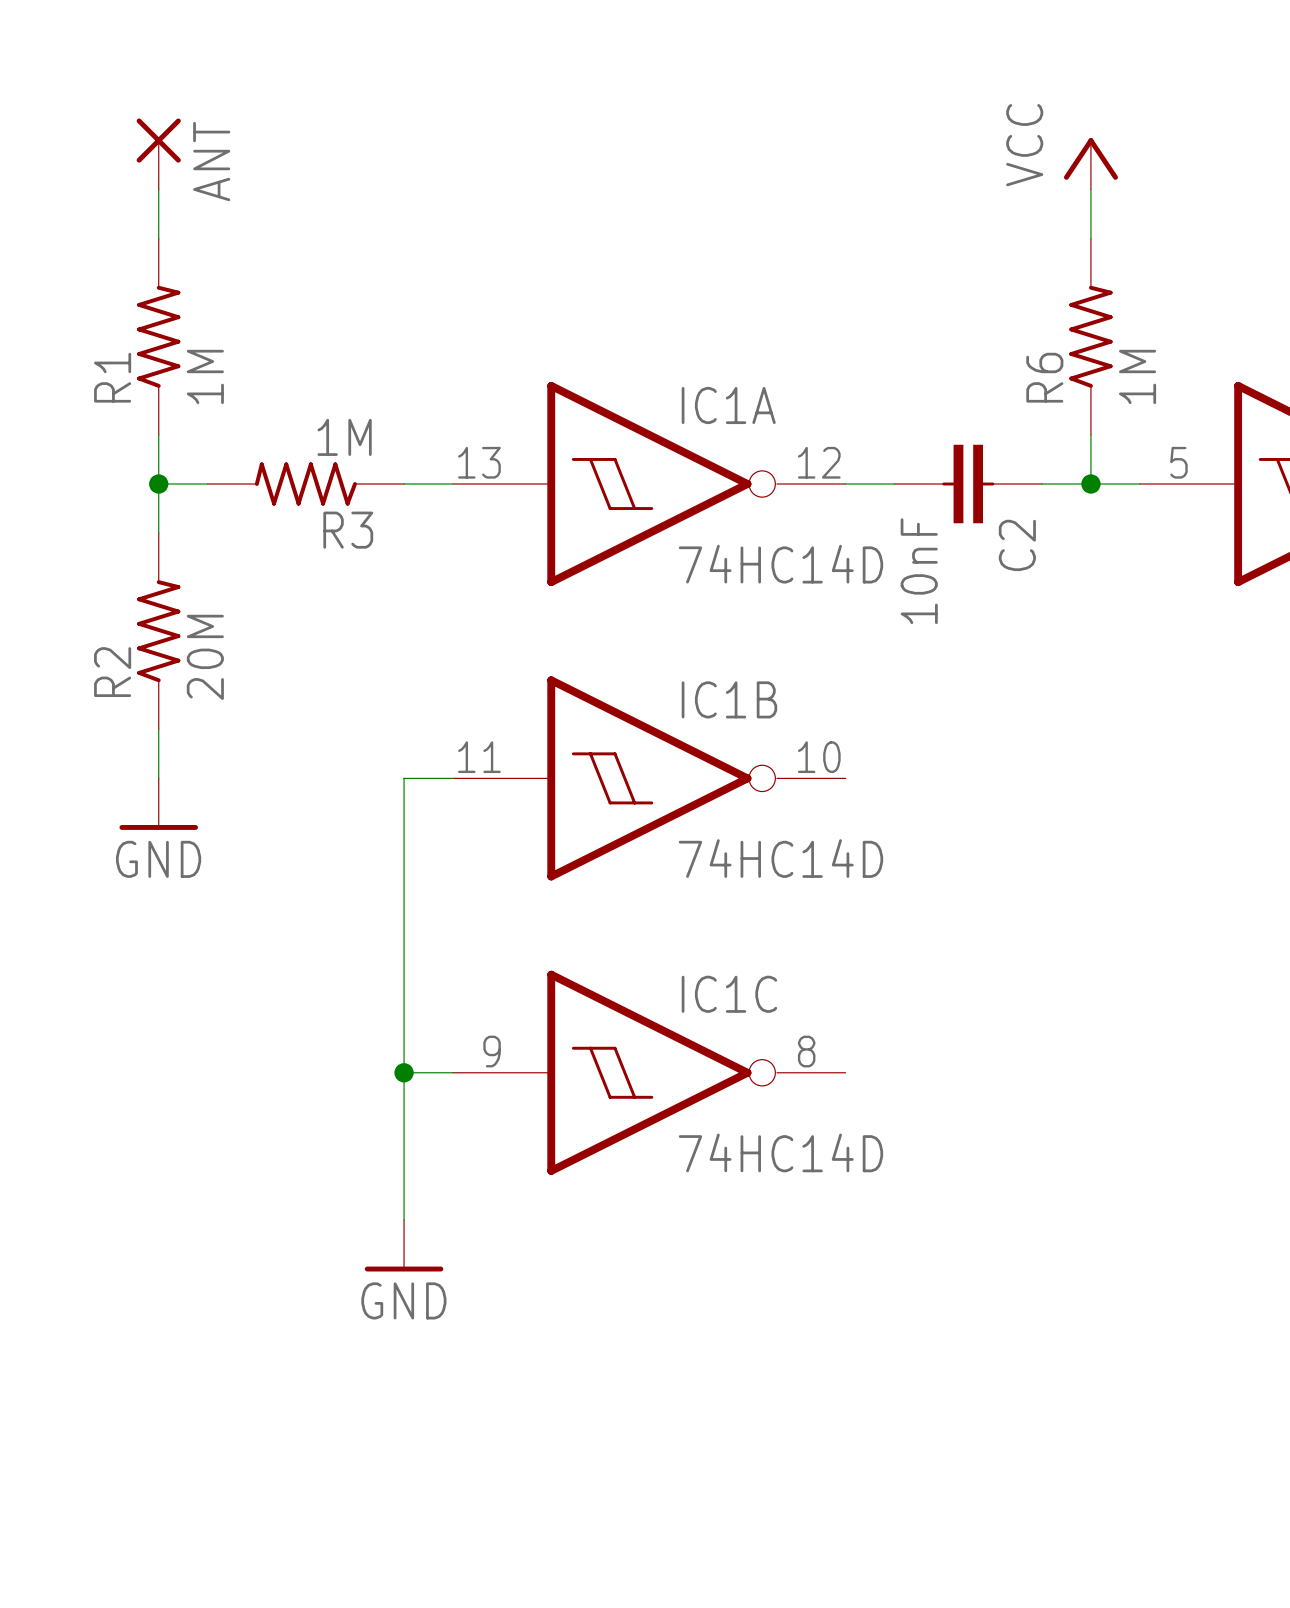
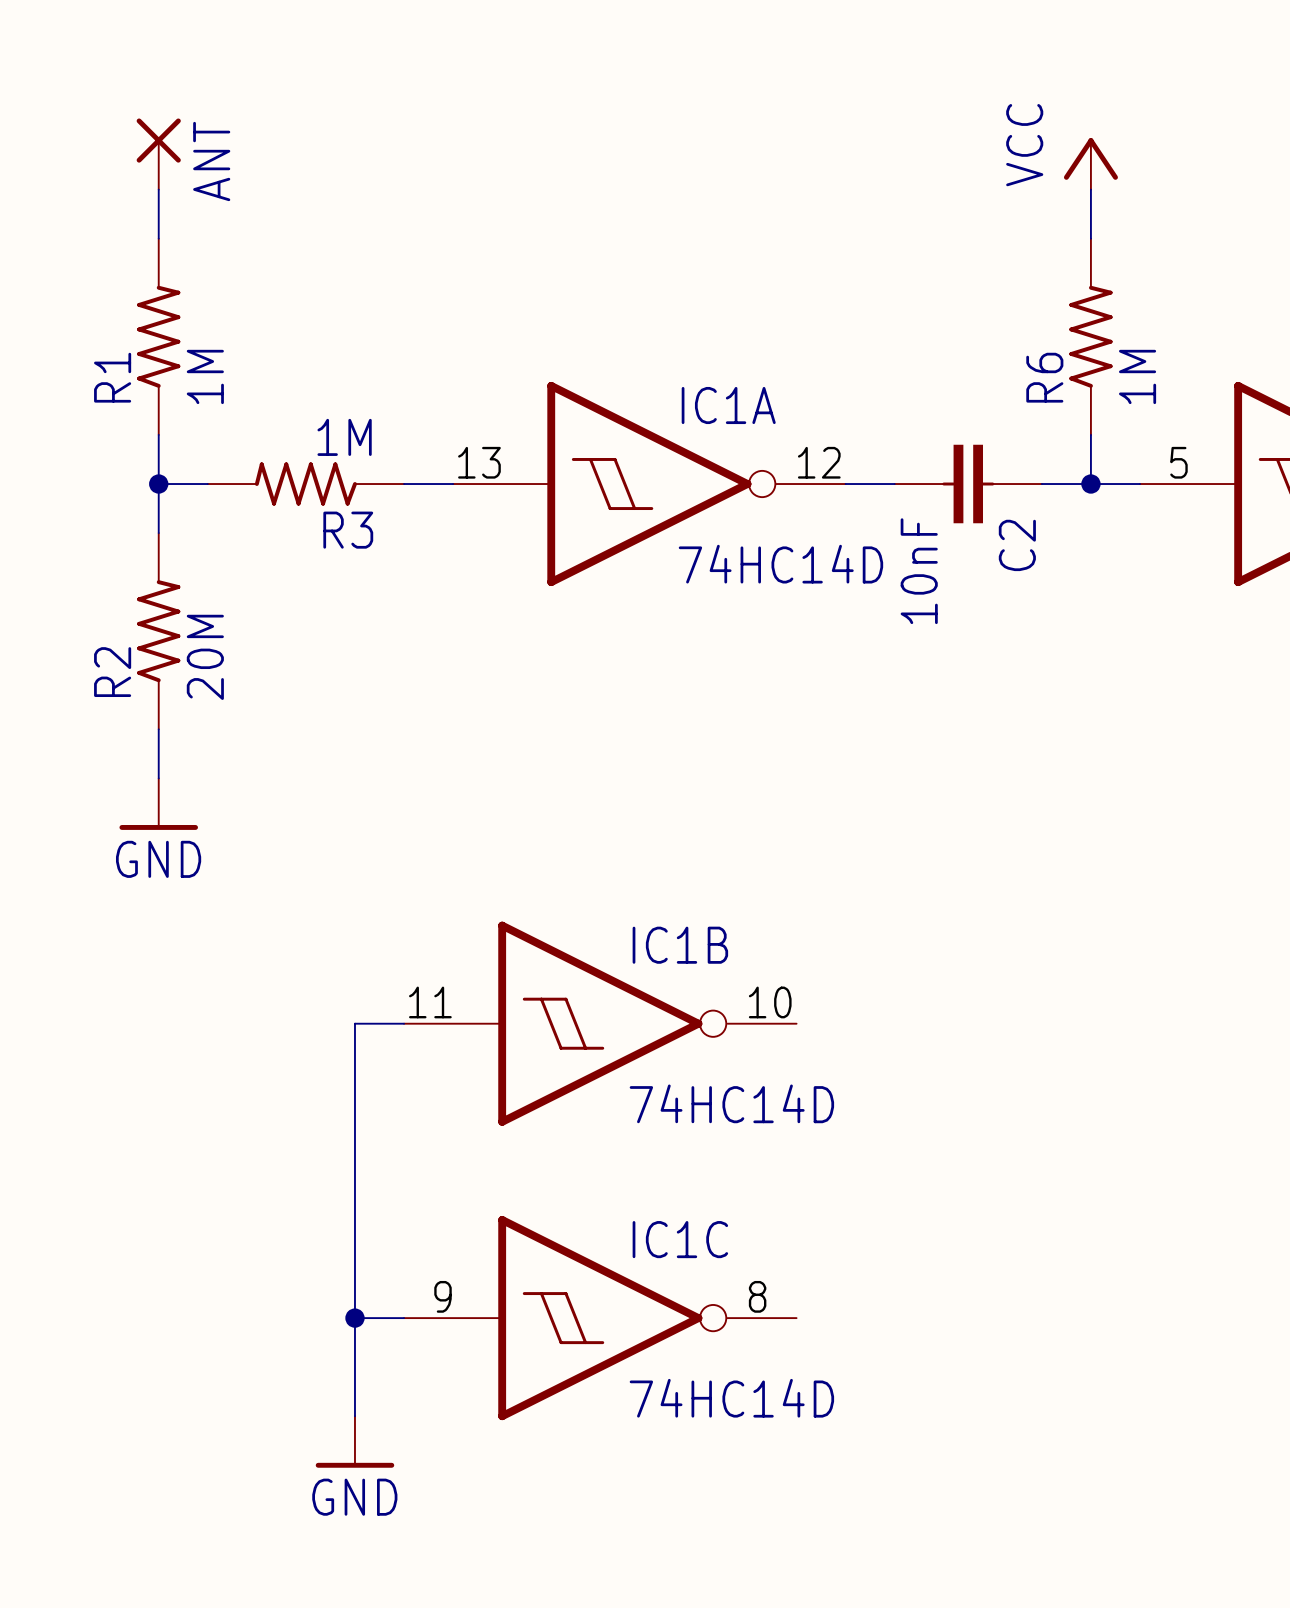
wire: (453, 778) (404, 778) (404, 1219) -> none
IC1B position: (649, 778) -> (600, 1023)
wire: none -> (404, 1023) (354, 1023) (354, 1416)
wire: (404, 1072) (453, 1072) -> (354, 1318) (404, 1318)
junction: (404, 1072) -> none
IC1C position: (649, 1072) -> (600, 1318)
power symbol position: GND (404, 1245) -> GND (354, 1441)
junction: none -> (354, 1318)

